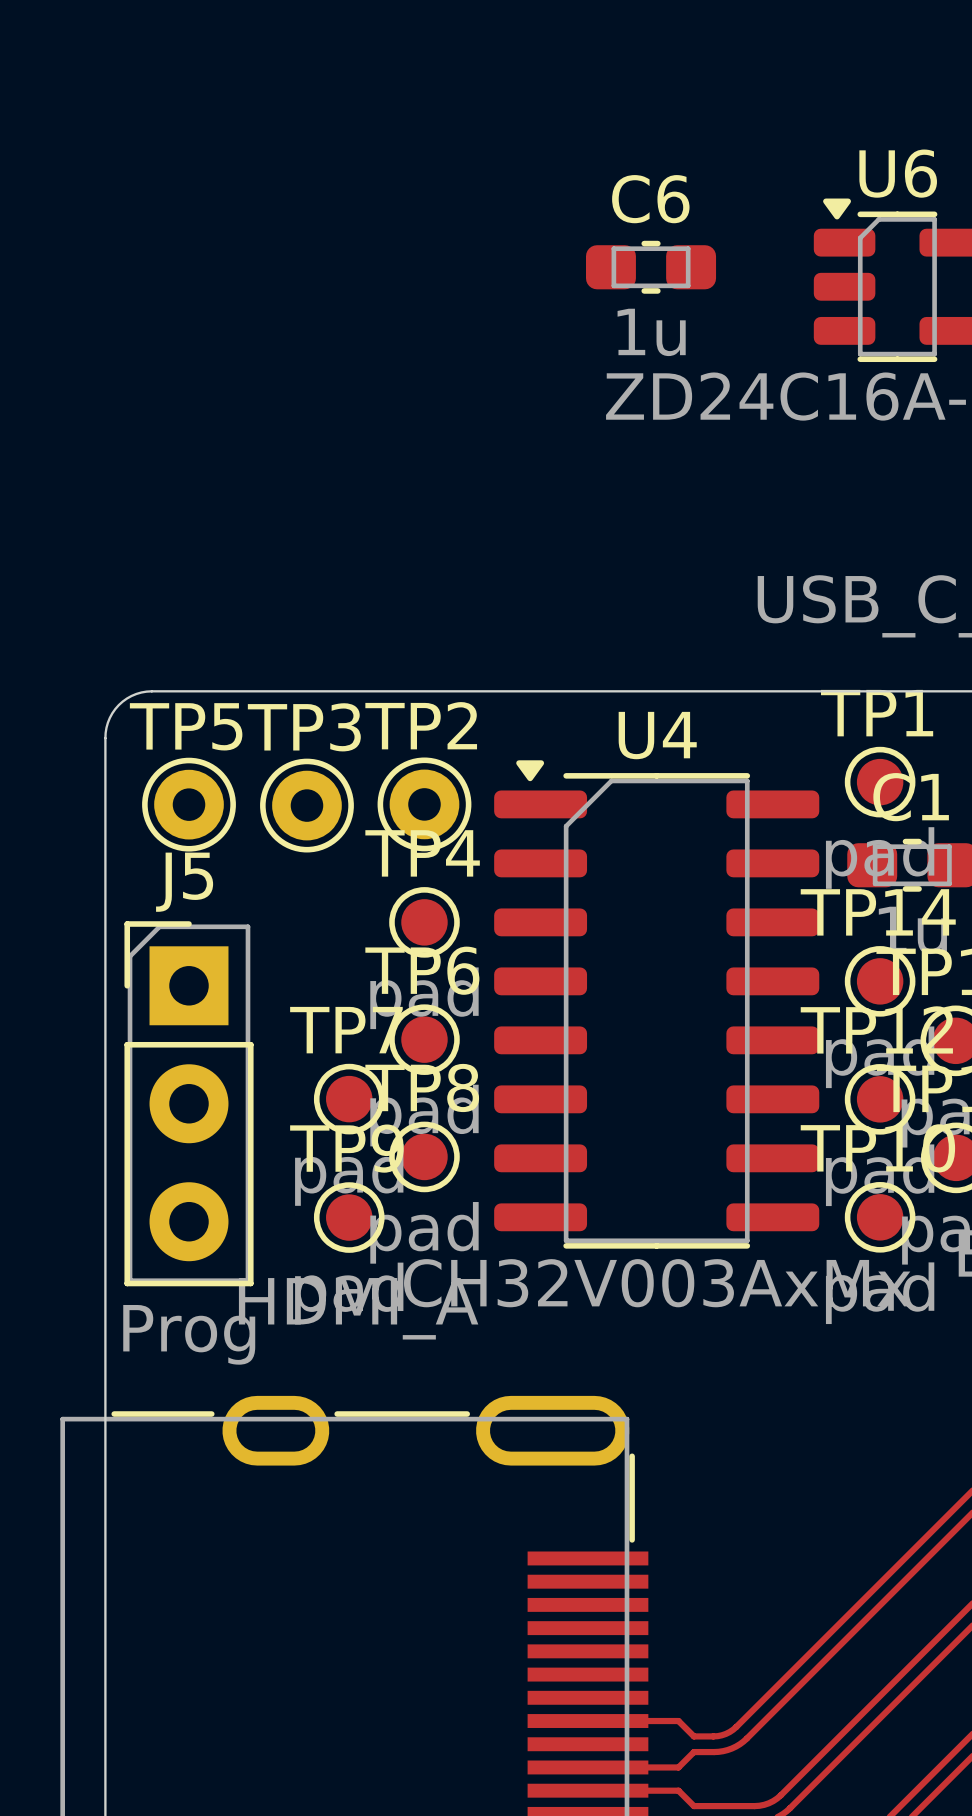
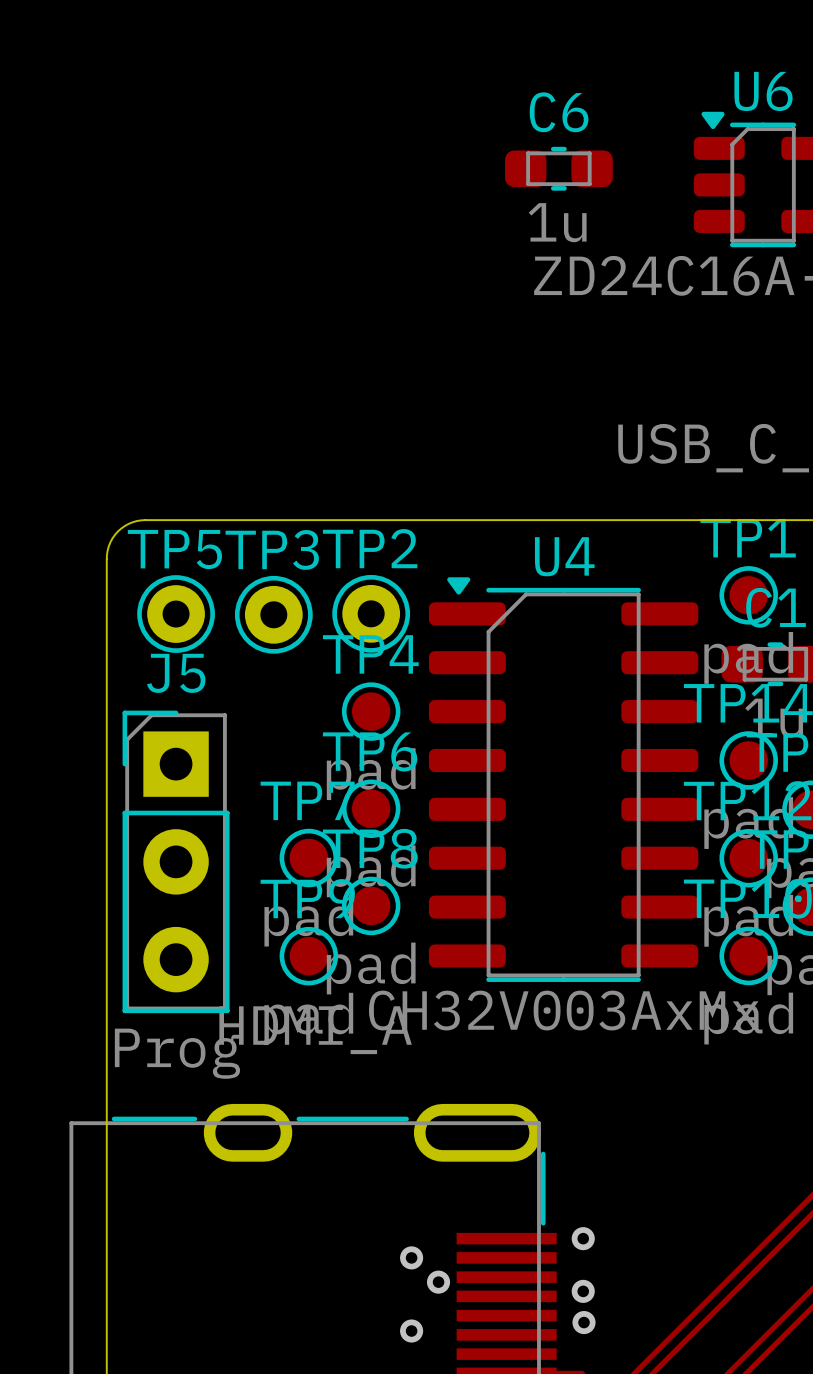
via: none -> (583, 1238)
via: none -> (411, 1257)
via: none -> (438, 1282)
via: none -> (583, 1291)
via: none -> (584, 1322)
via: none -> (411, 1331)

